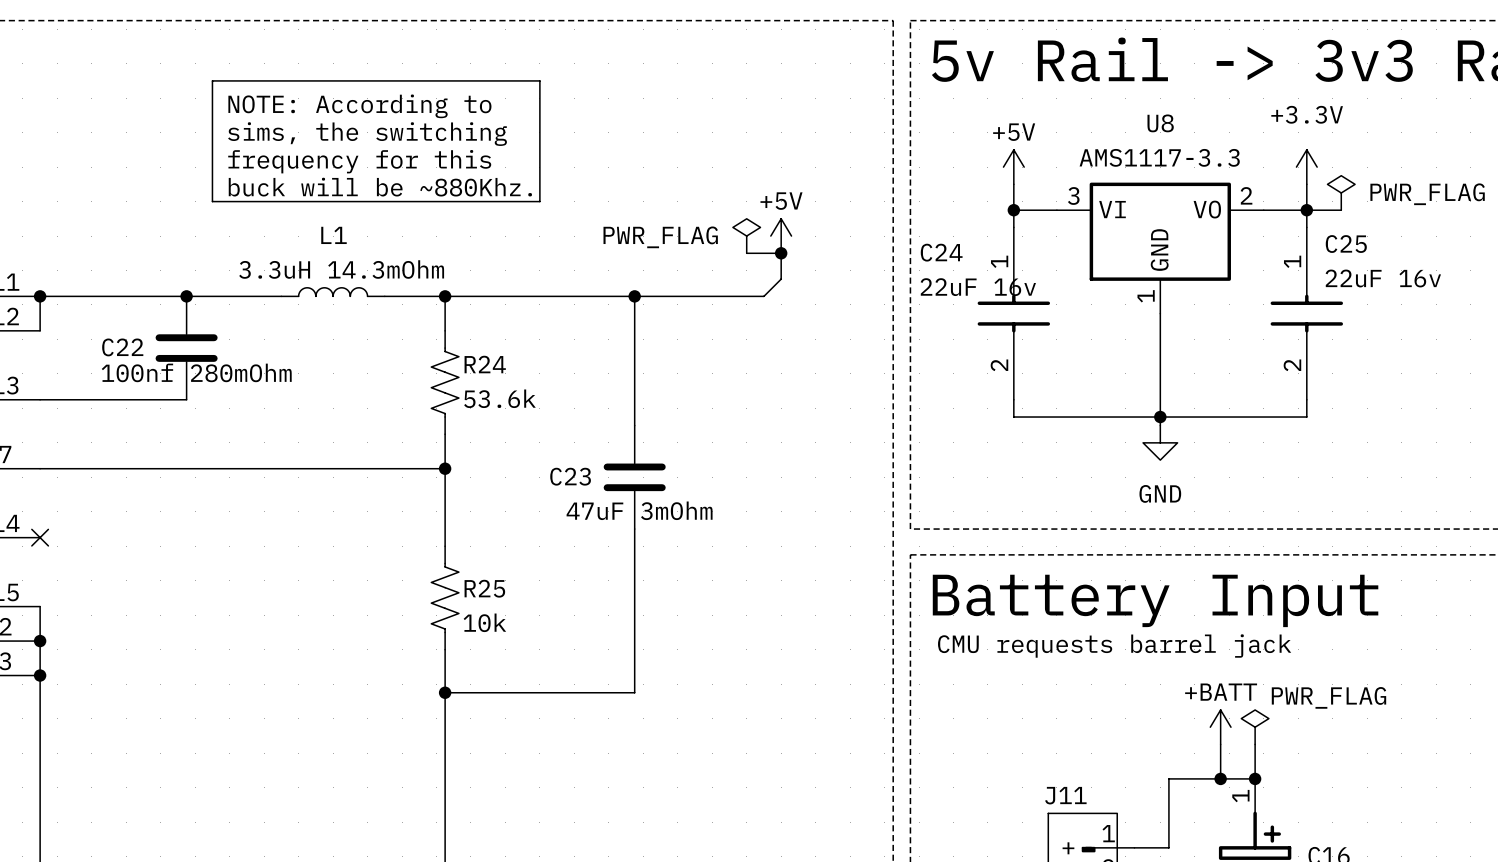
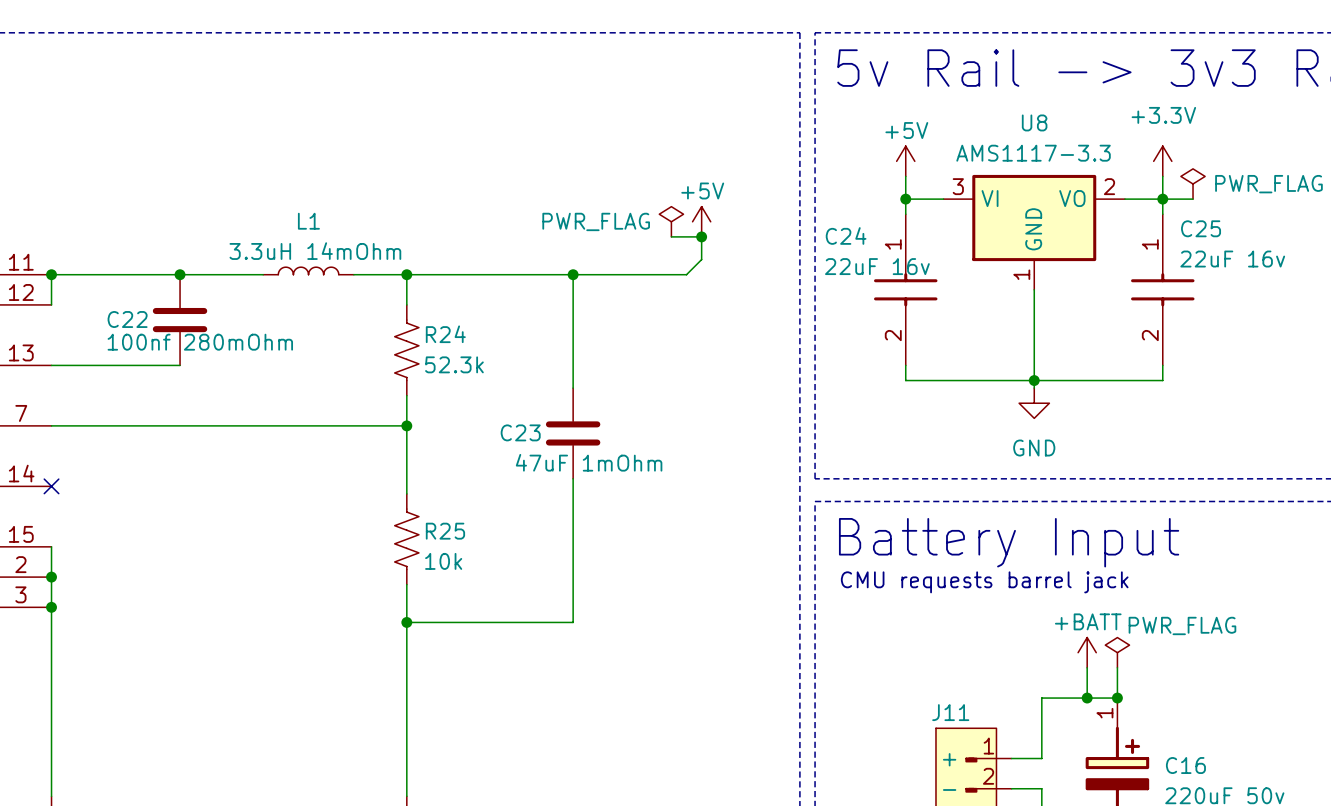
line: (212, 80) (539, 80) (539, 201) (212, 201) (212, 80) -> none
text: NOTE: According to (359, 106) -> none
text: sims, the switching (367, 134) -> none
text: frequency for this (359, 161) -> none
text: buck will be ~880Khz. (380, 187) -> none
L1 value: 3.3uH 14.3mOhm (341, 269) -> 3.3uH 14mOhm (315, 251)
R24 value: 53.6k (499, 398) -> 52.3k (454, 364)
C23 value: 47uF 3mOhm (639, 510) -> 47uF 1mOhm (589, 462)

